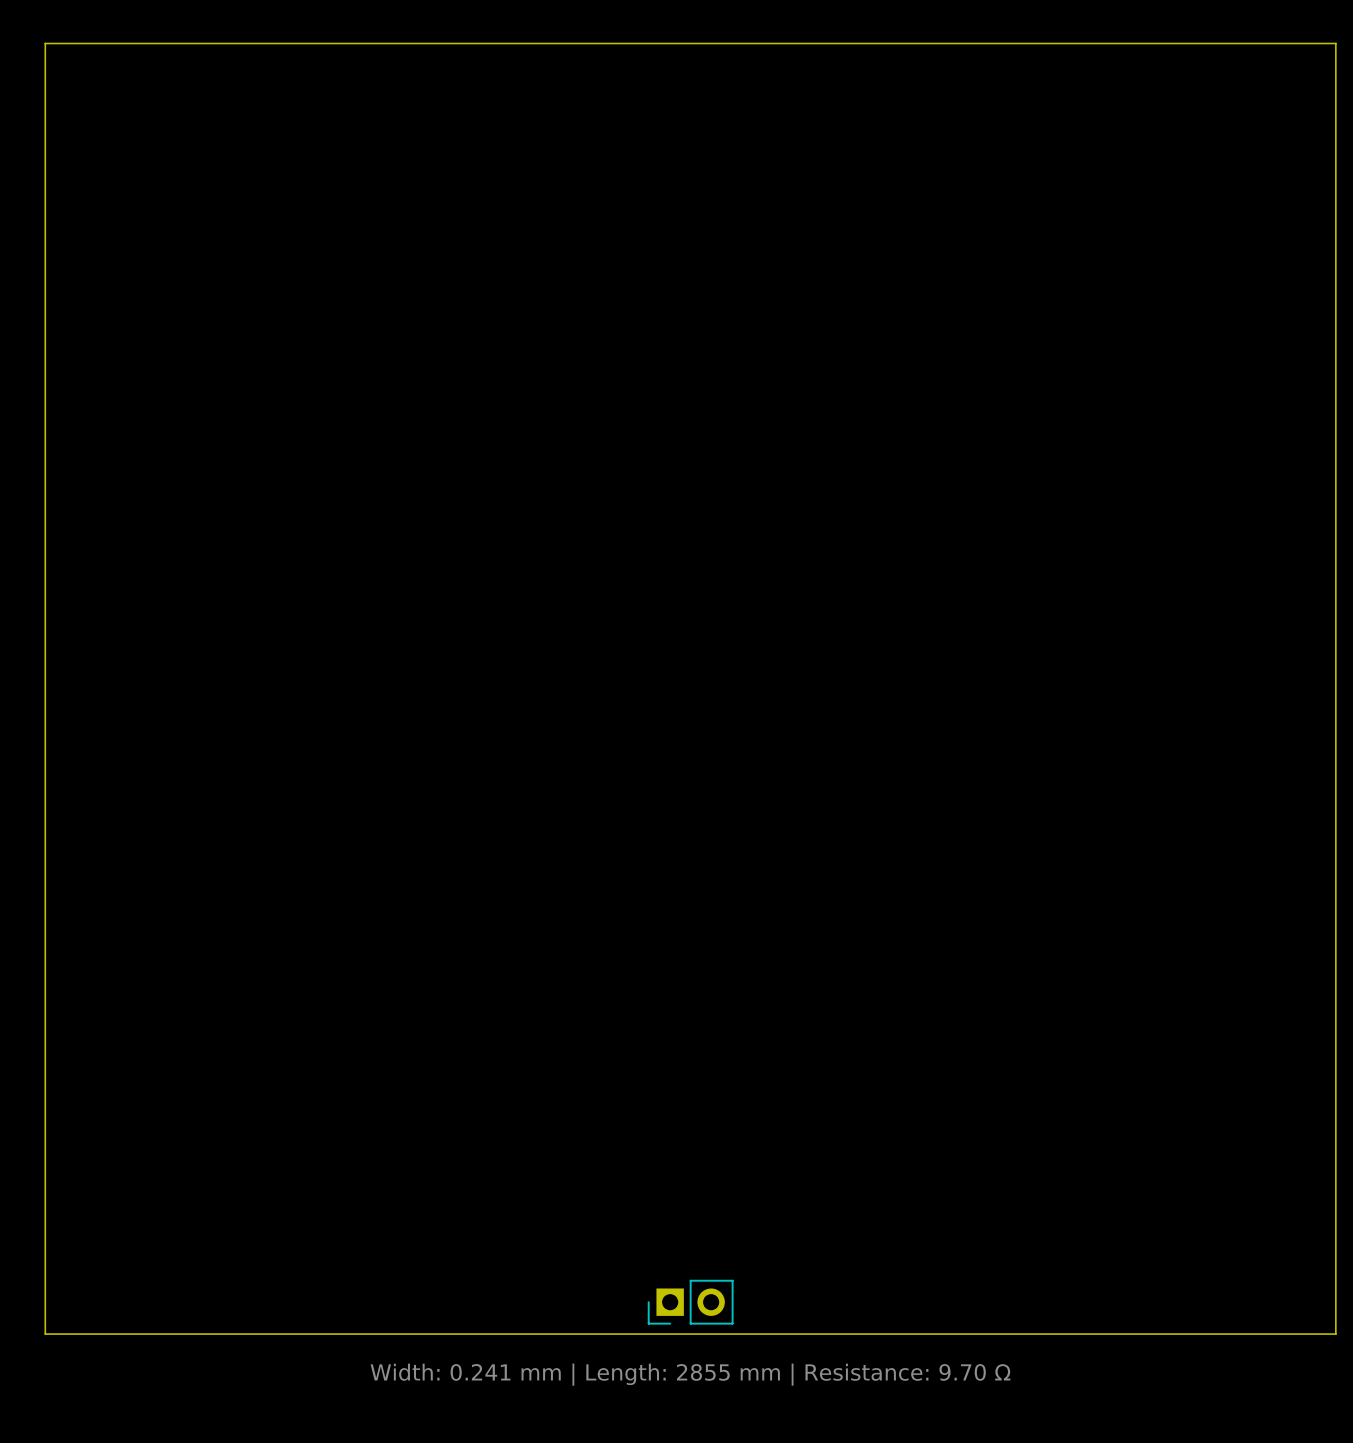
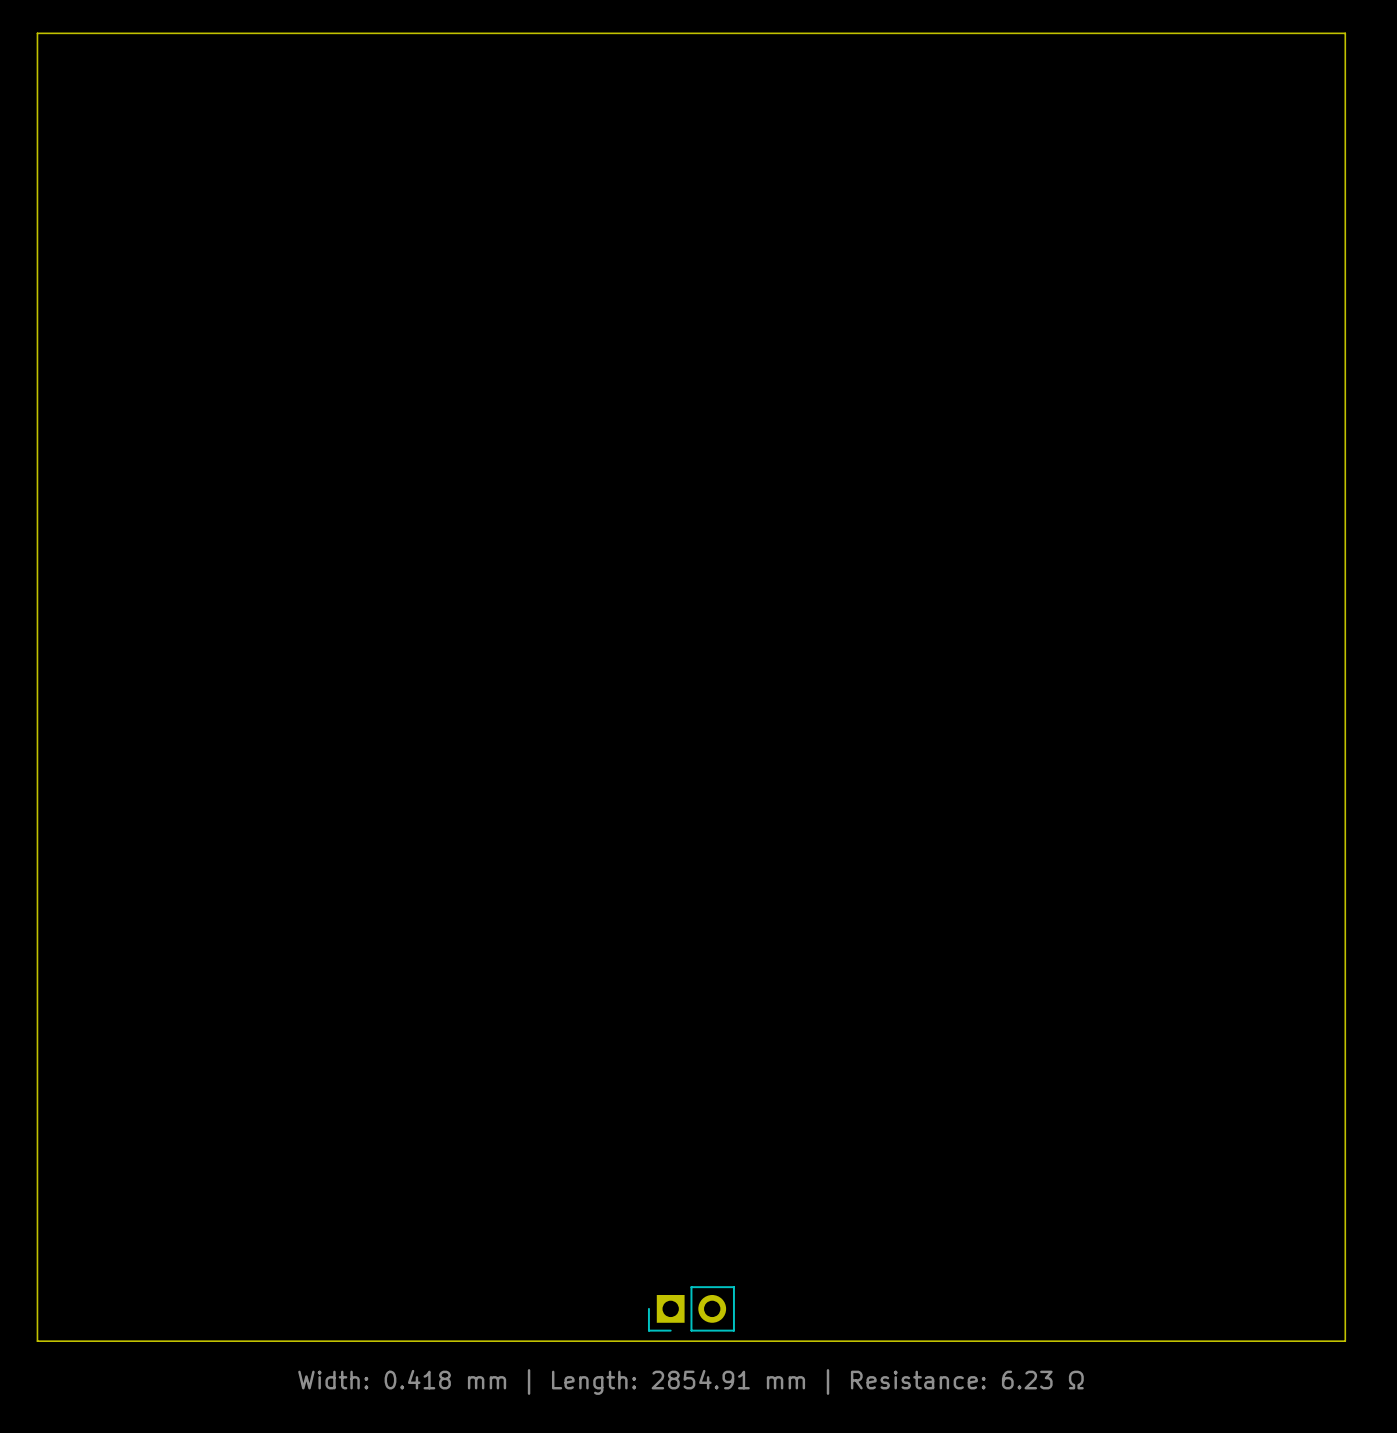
text: Width: 0.241 mm | Length: 2855 mm | Resistance: 9.70 Ω (690, 1374) -> Width: 0.418 mm | Length: 2854.91 mm | Resistance: 6.23 Ω (690, 1381)

